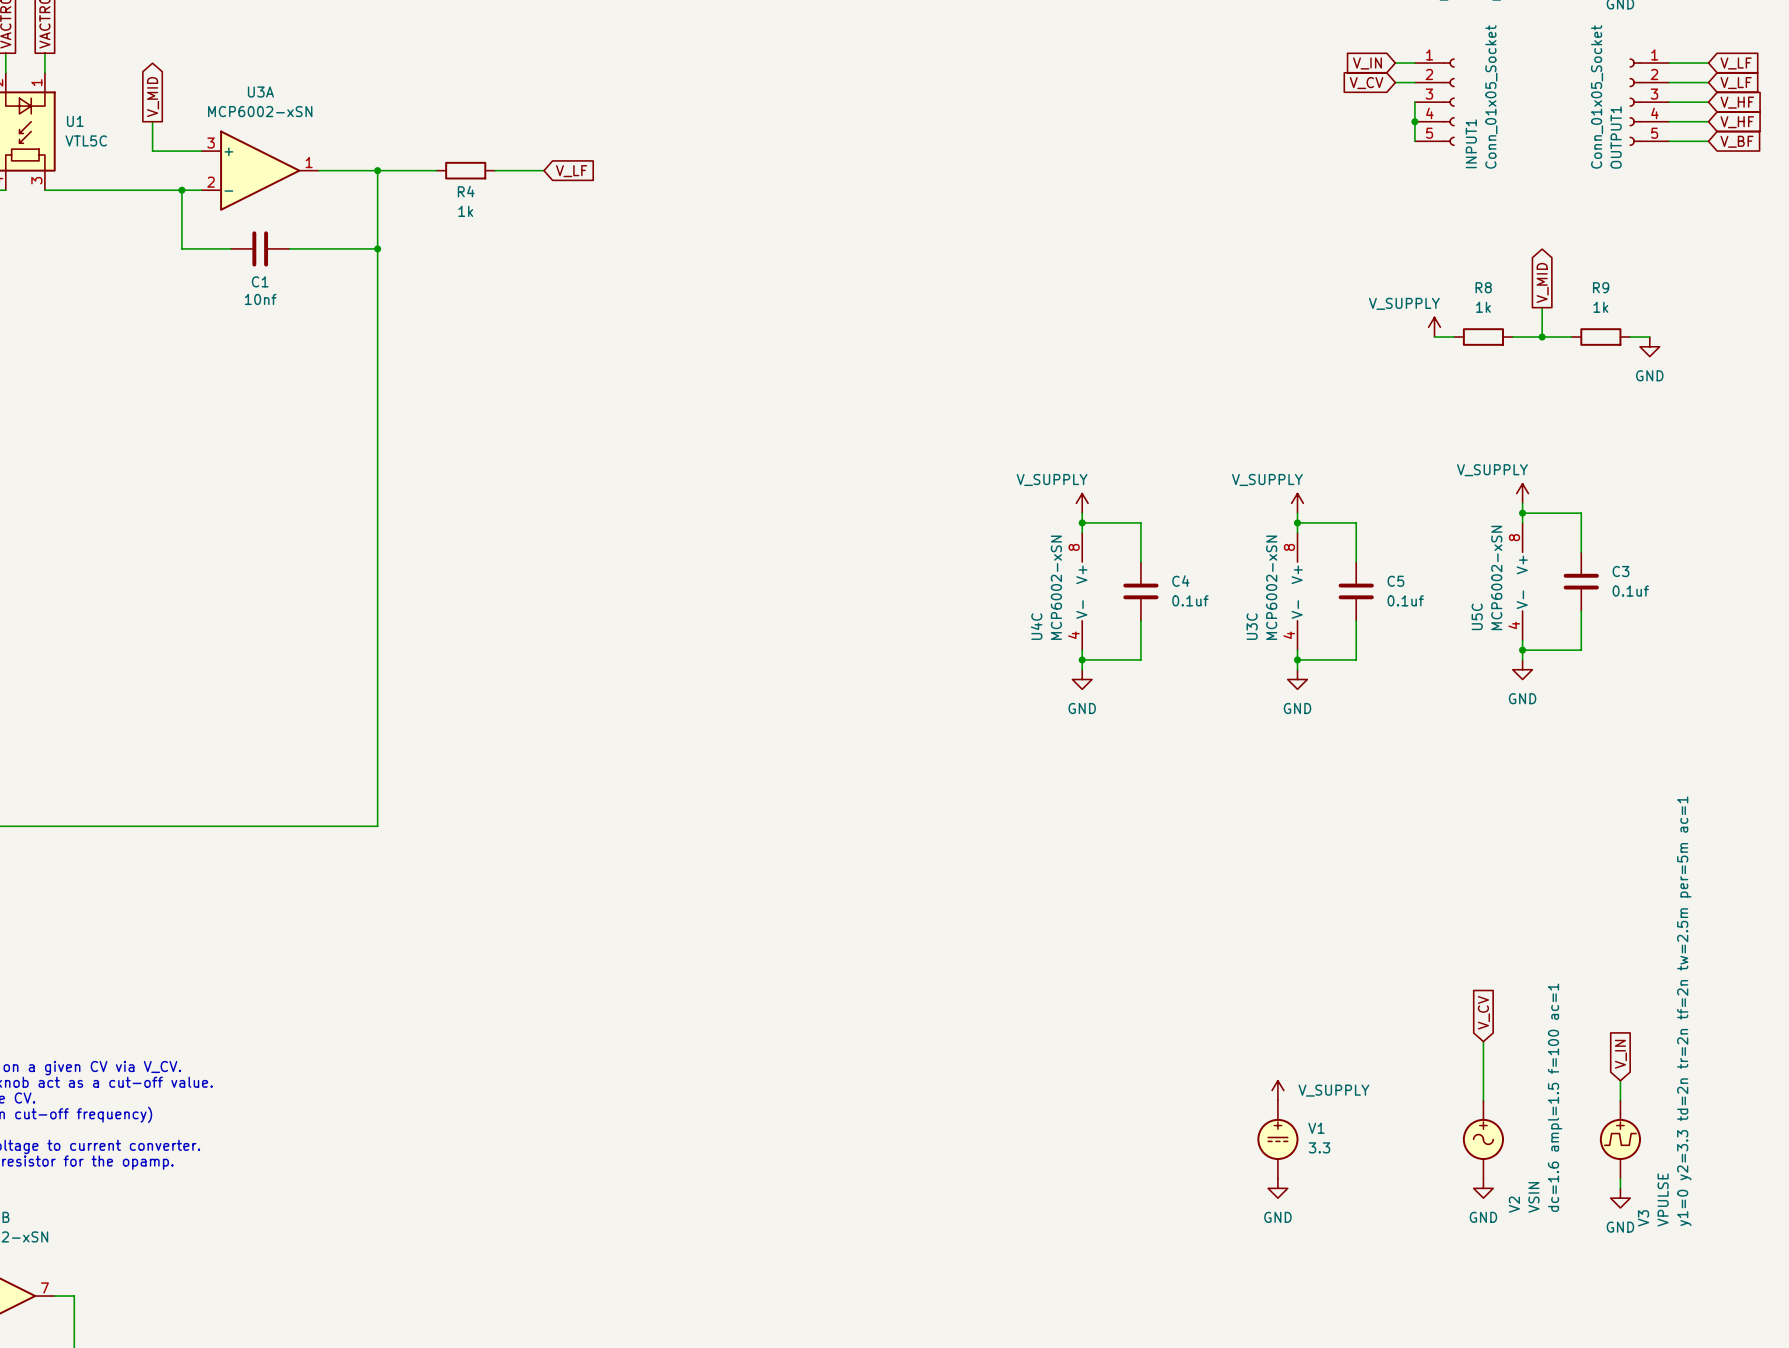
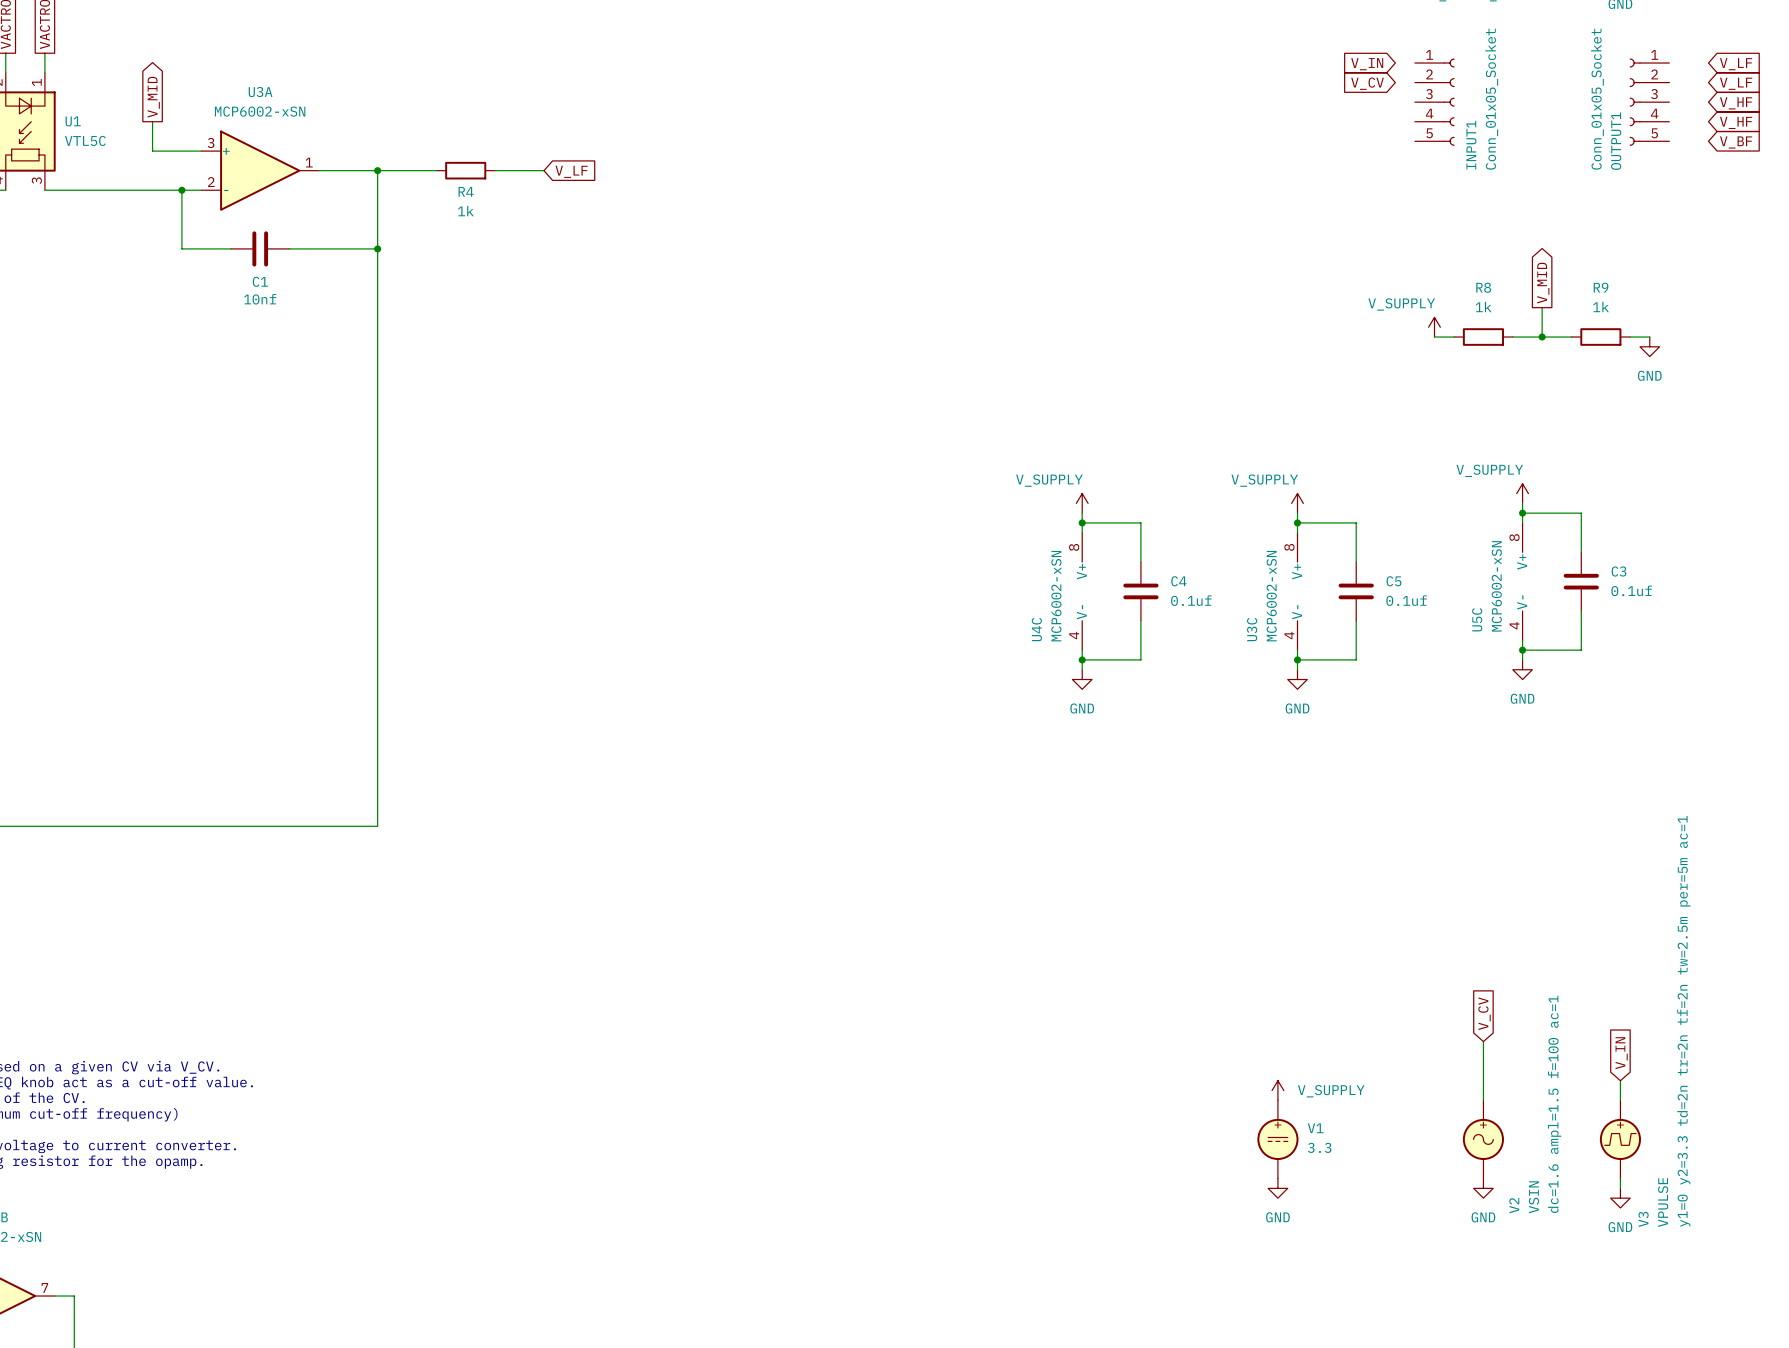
wire: (1395, 63) (1414, 63) -> none
wire: (1669, 63) (1708, 63) -> none
wire: (1395, 82) (1414, 82) -> none
wire: (1669, 82) (1708, 82) -> none
wire: (1414, 102) (1414, 141) -> none
wire: (1669, 102) (1708, 102) -> none
junction: (1414, 121) -> none
wire: (1669, 121) (1708, 121) -> none
wire: (1669, 141) (1708, 141) -> none

